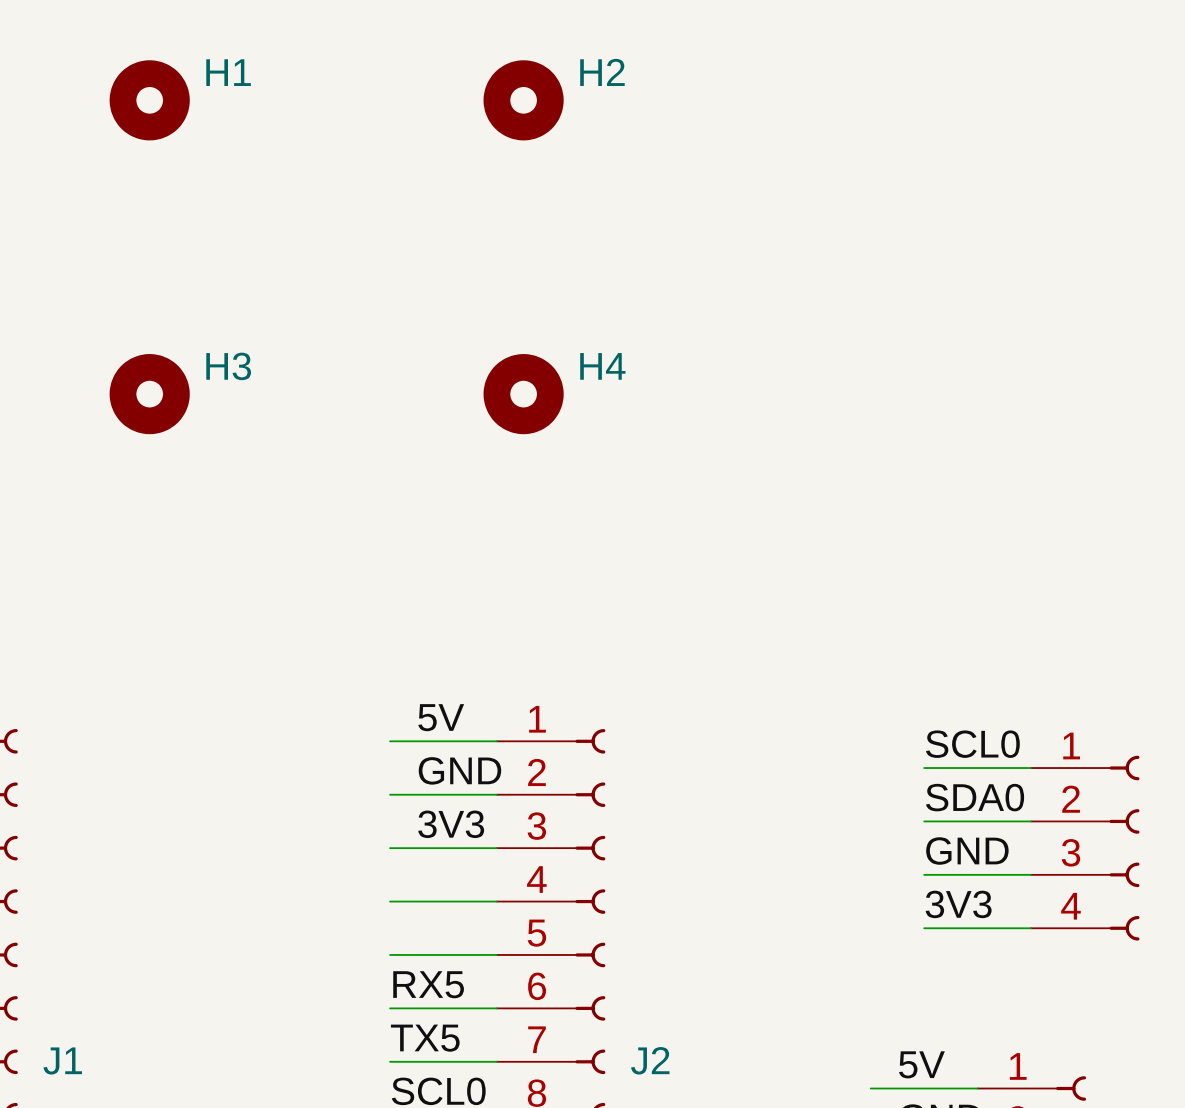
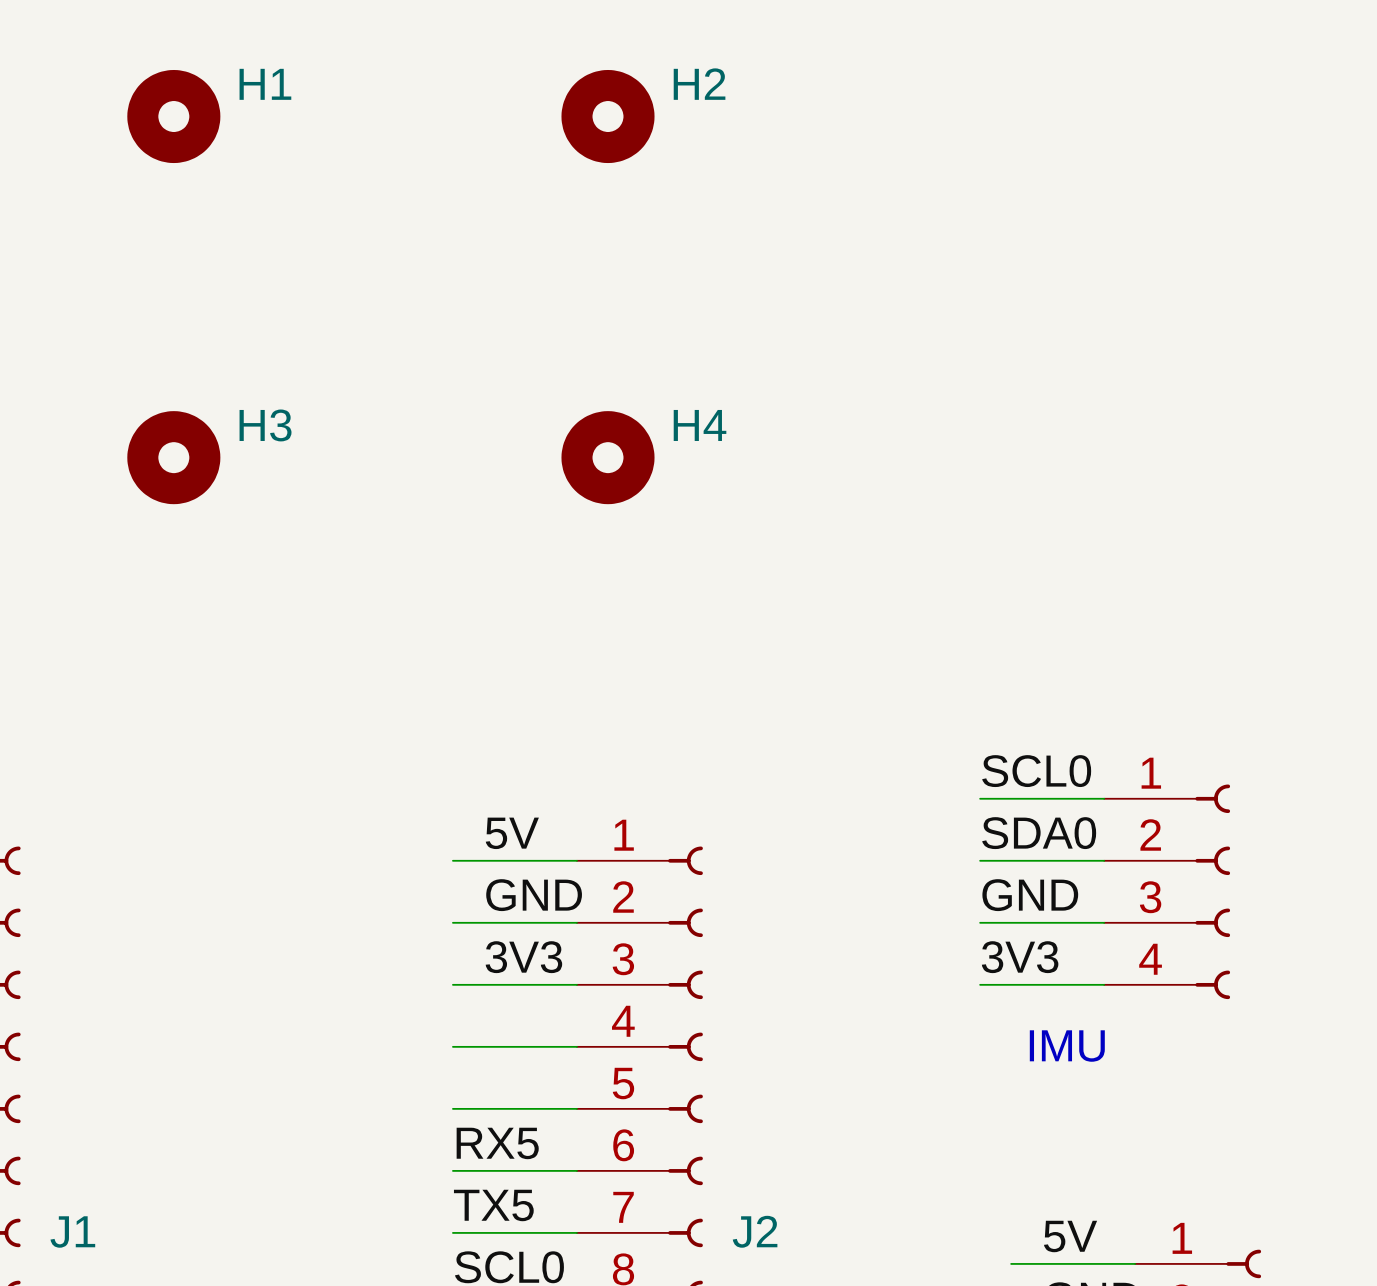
label position: SCL0 (972, 744) -> SCL0 (1036, 771)
wire: (924, 768) (1031, 768) -> (980, 860) (1104, 860)
label position: SDA0 (975, 797) -> SDA0 (1039, 833)
wire: (924, 821) (1031, 821) -> (980, 984) (1104, 984)
part position: (1085, 848) -> (1167, 891)
label position: GND (967, 851) -> GND (1030, 895)
wire: (924, 874) (1031, 874) -> (980, 922) (1104, 922)
text: none -> IMU (1067, 1046)
label position: 3V3 (958, 904) -> 3V3 (1020, 957)
wire: (924, 928) (1031, 928) -> (980, 798) (1104, 798)

